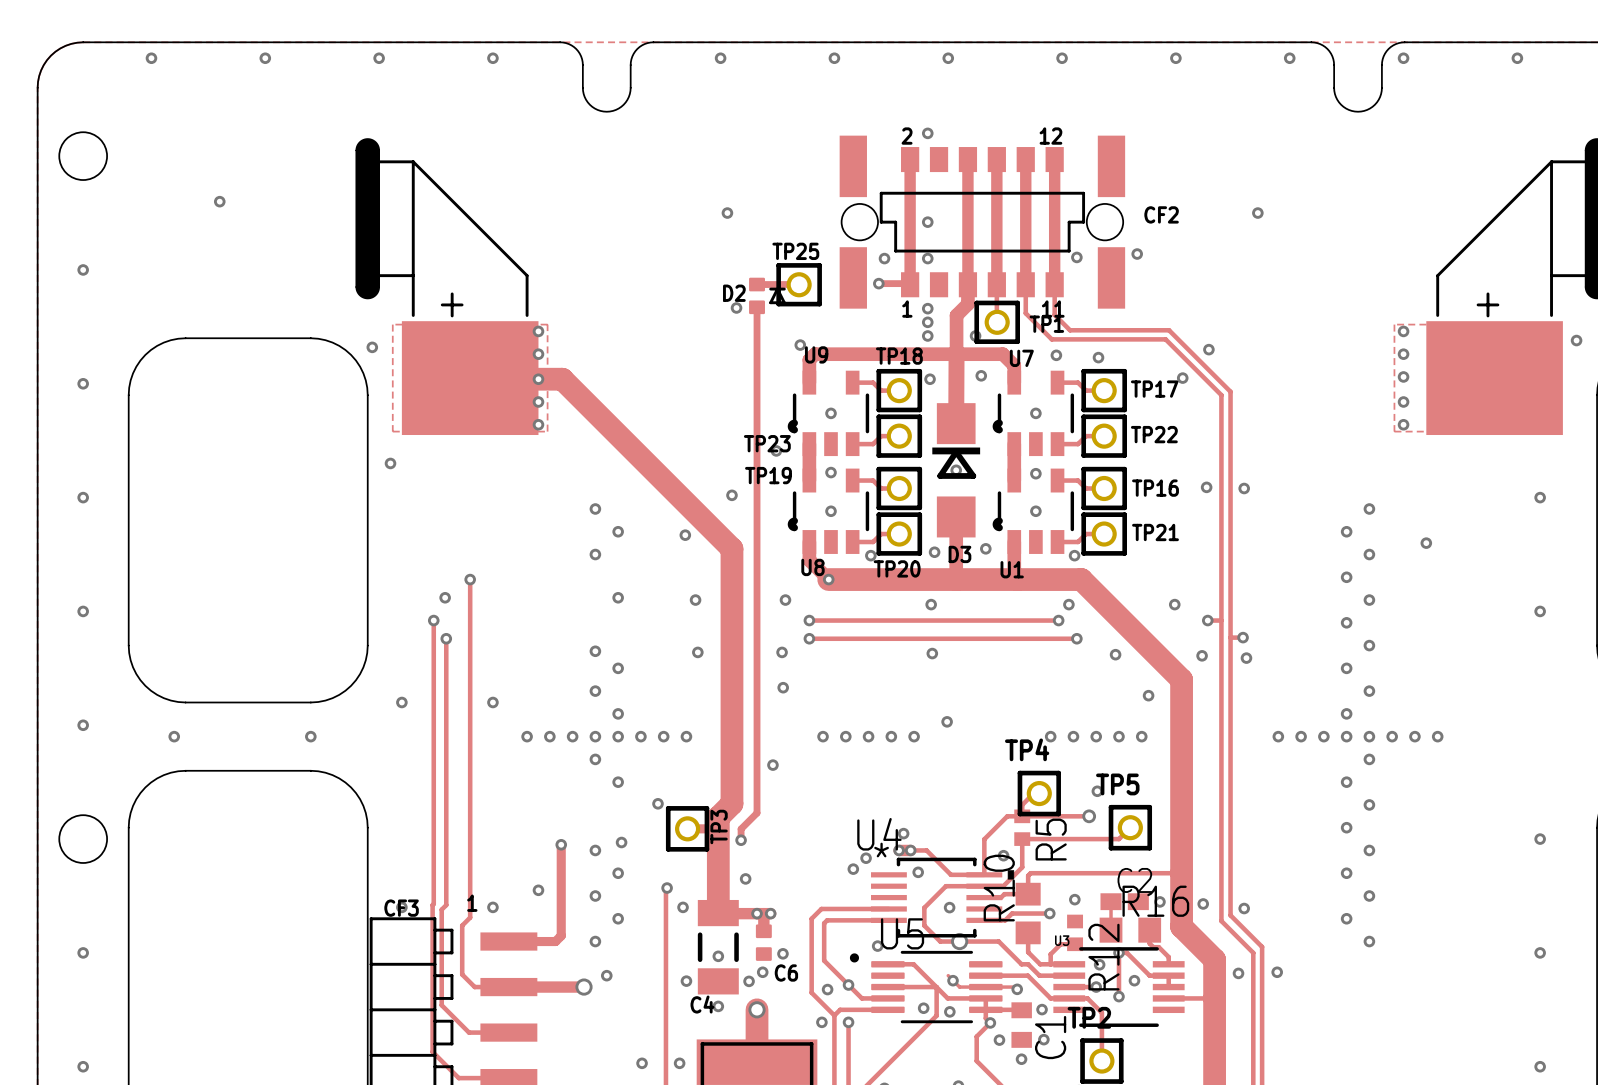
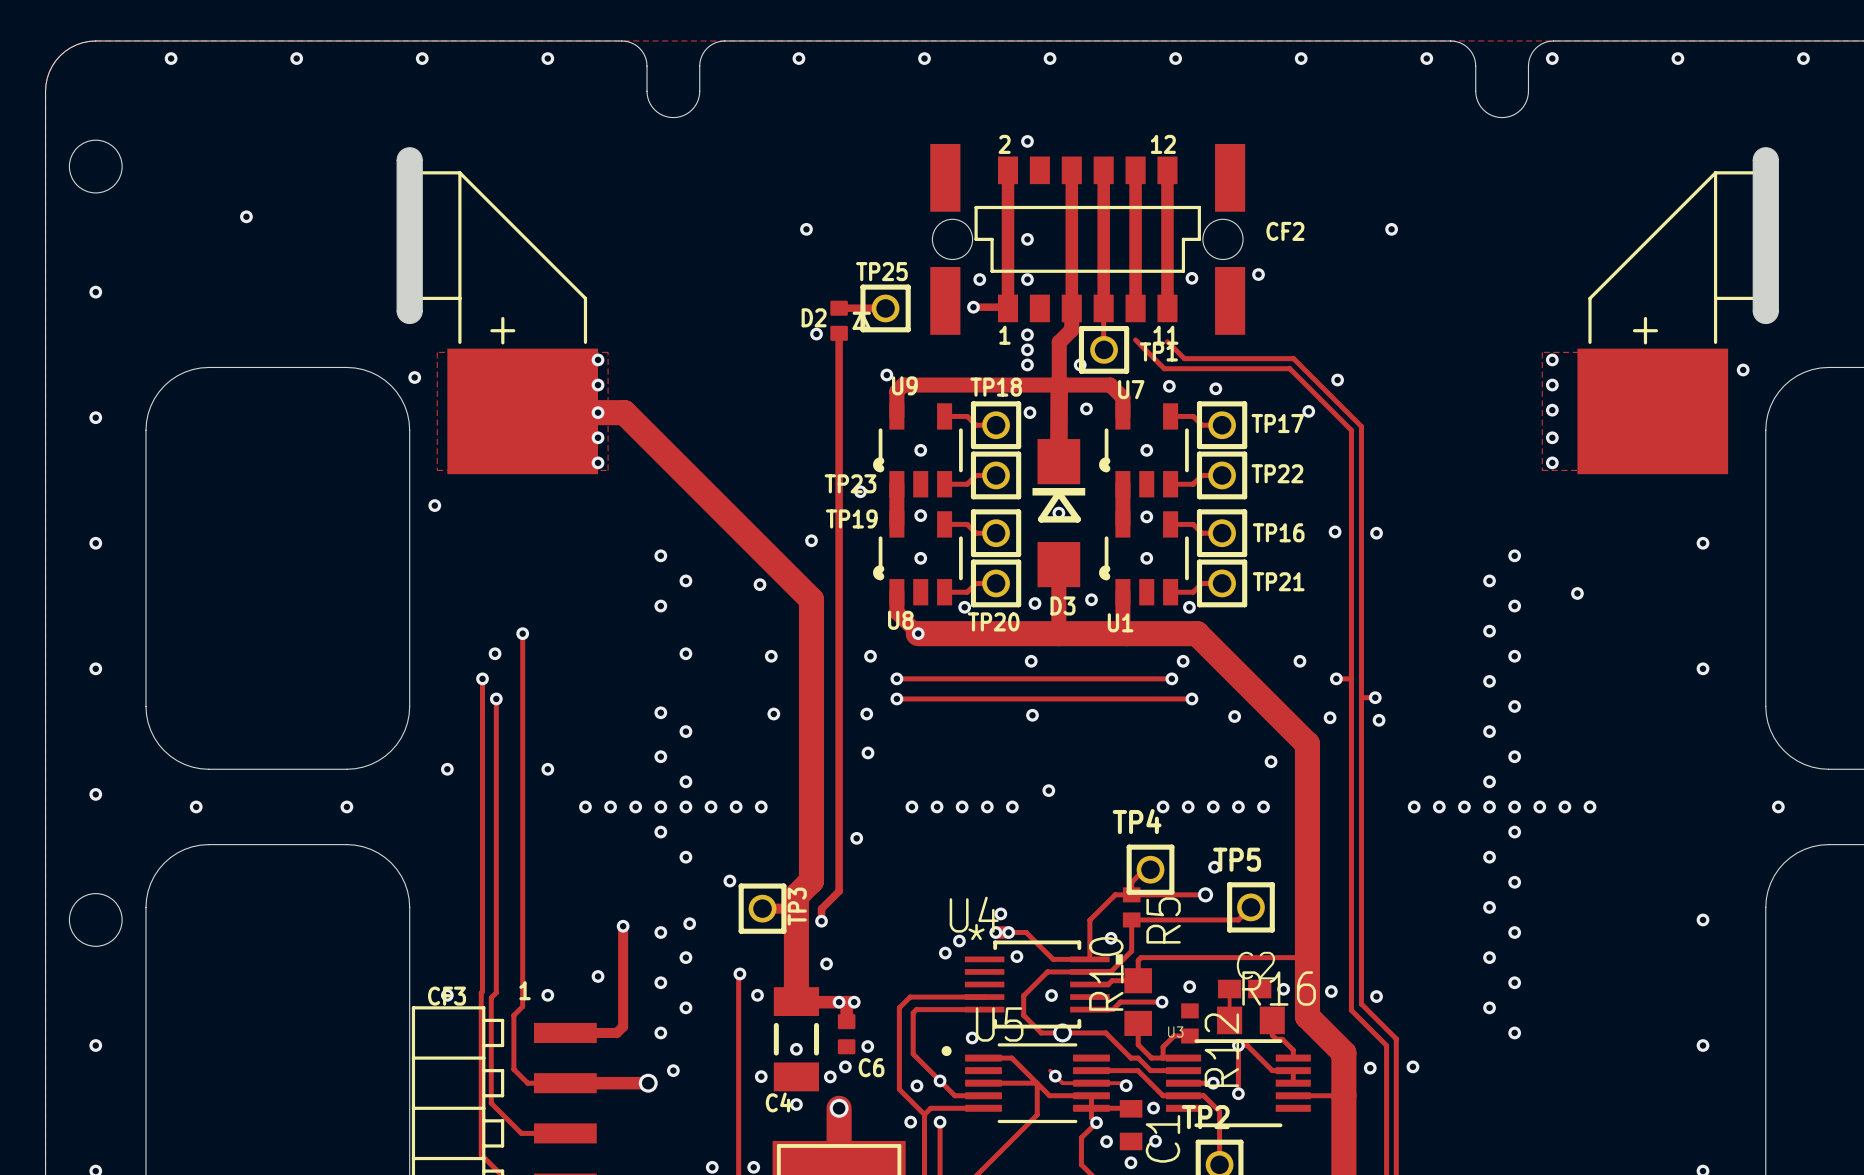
track: (1025, 284) (1025, 313) -> none
track: (1054, 284) (1054, 314) -> none
via: (1099, 964) -> none
via: (1134, 980) -> none
via: (923, 1008) -> none
via: (949, 1011) -> none

